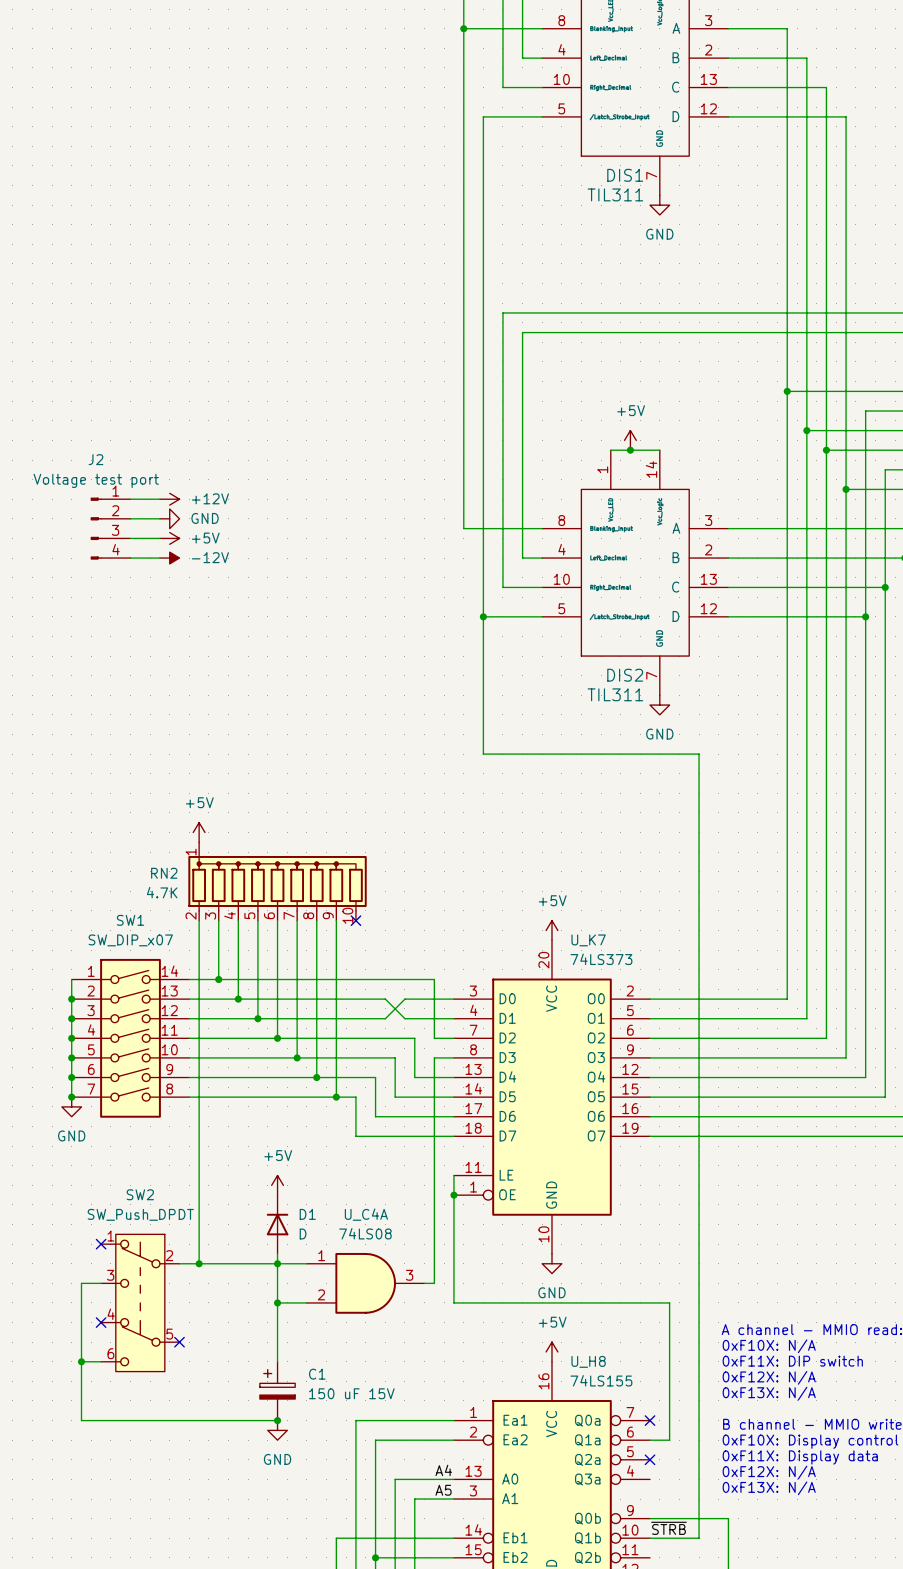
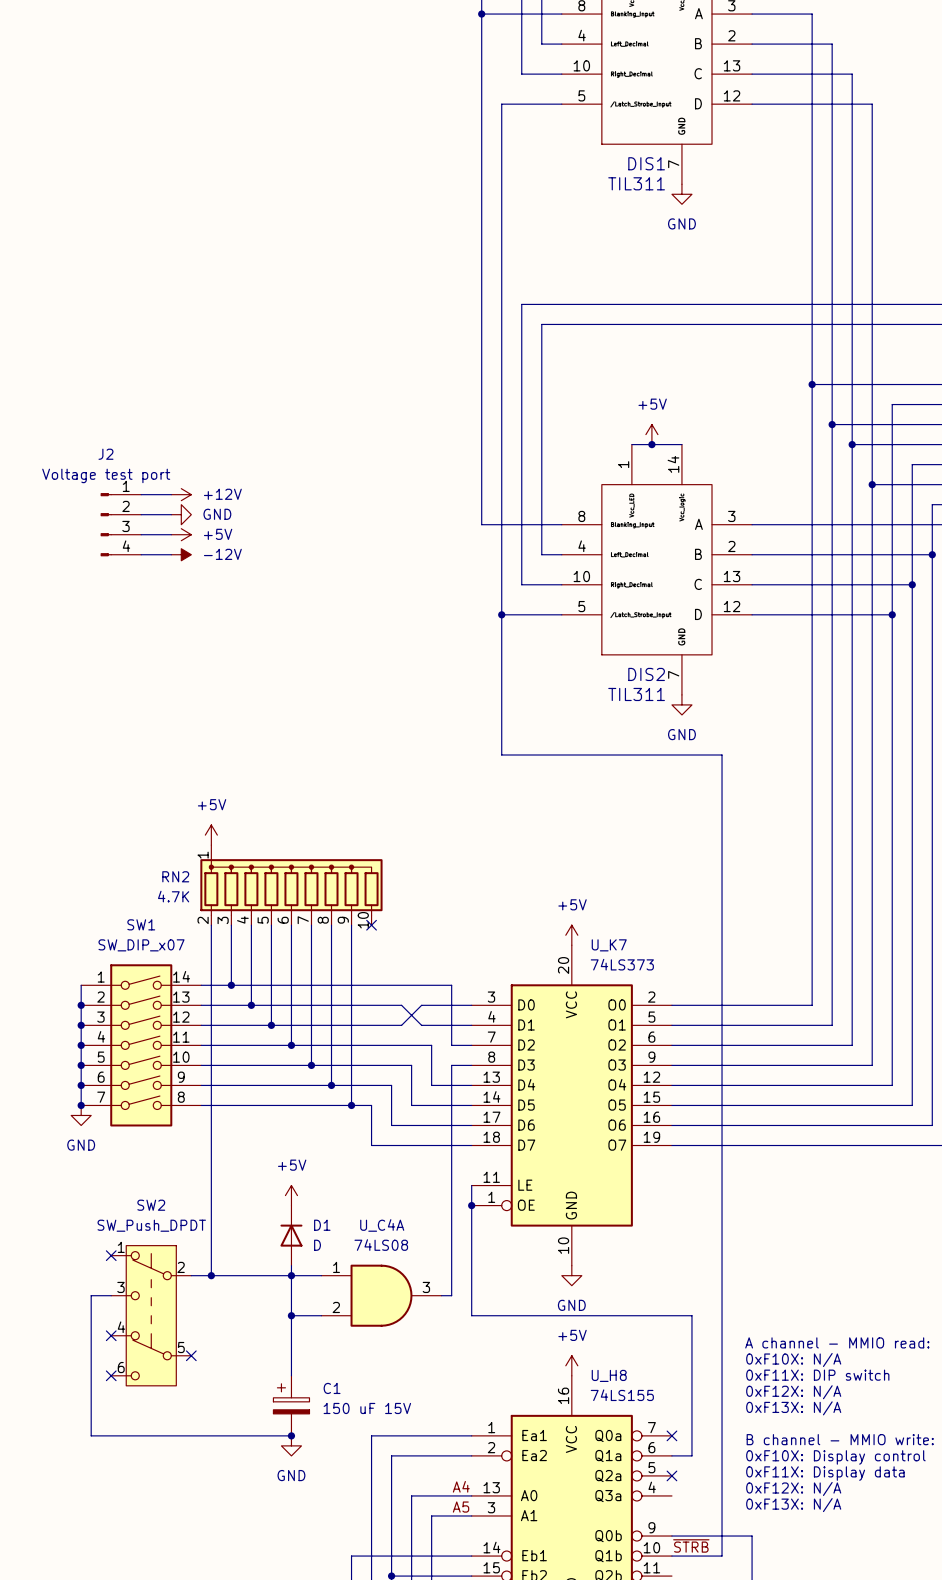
wire: (81, 1361) (101, 1361) -> none
junction: (81, 1361) -> none
no-connect mark: none -> (111, 1375)

